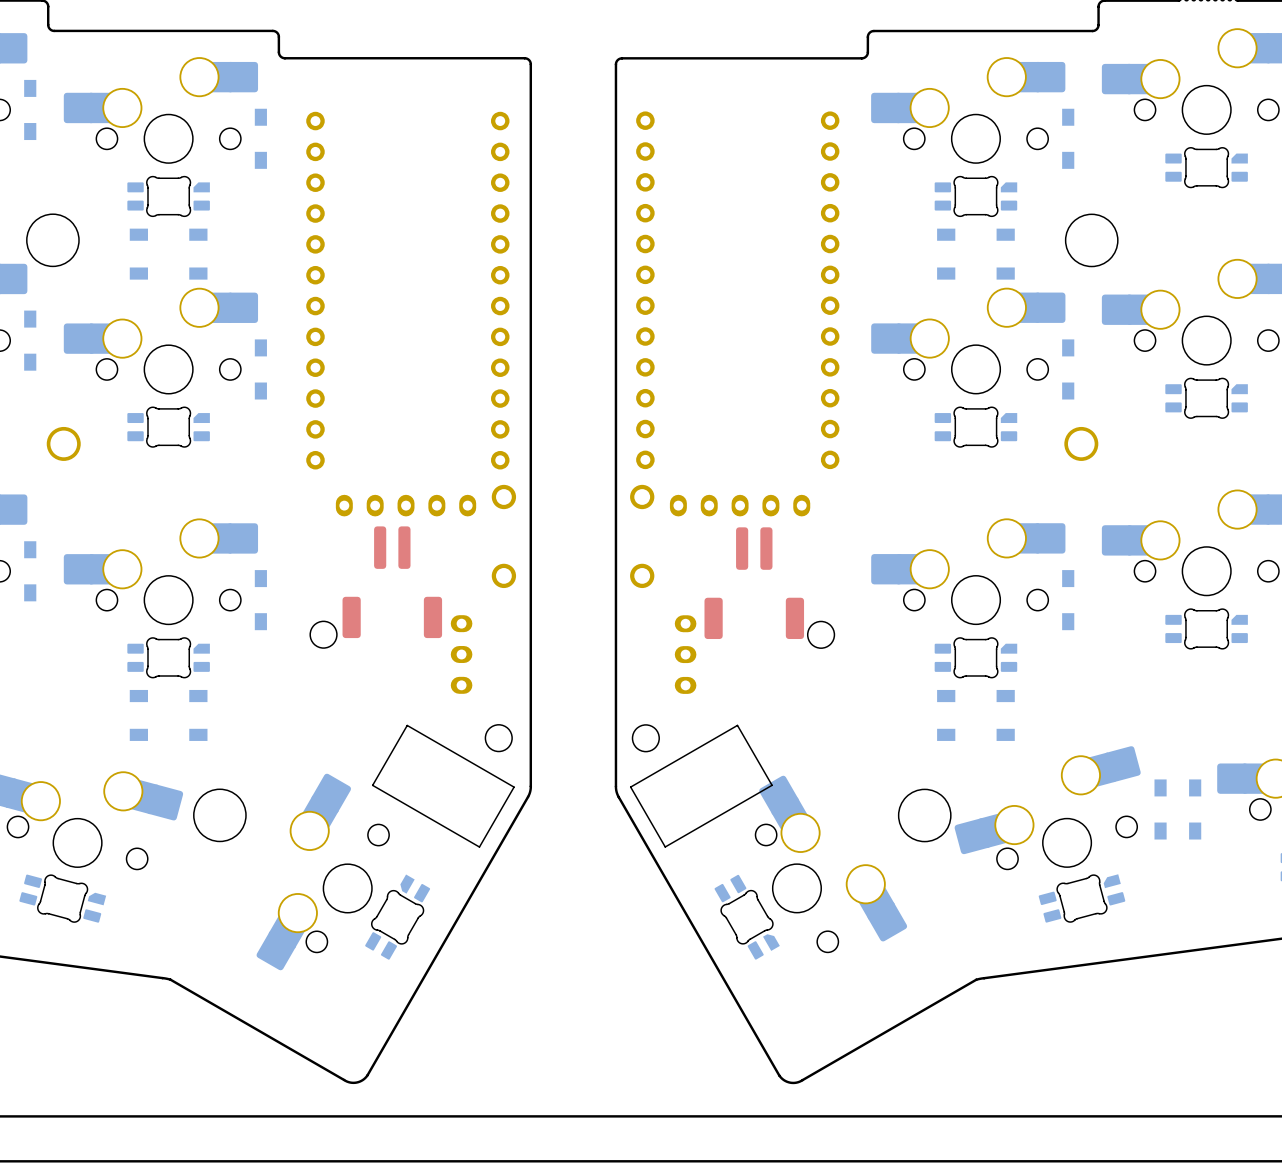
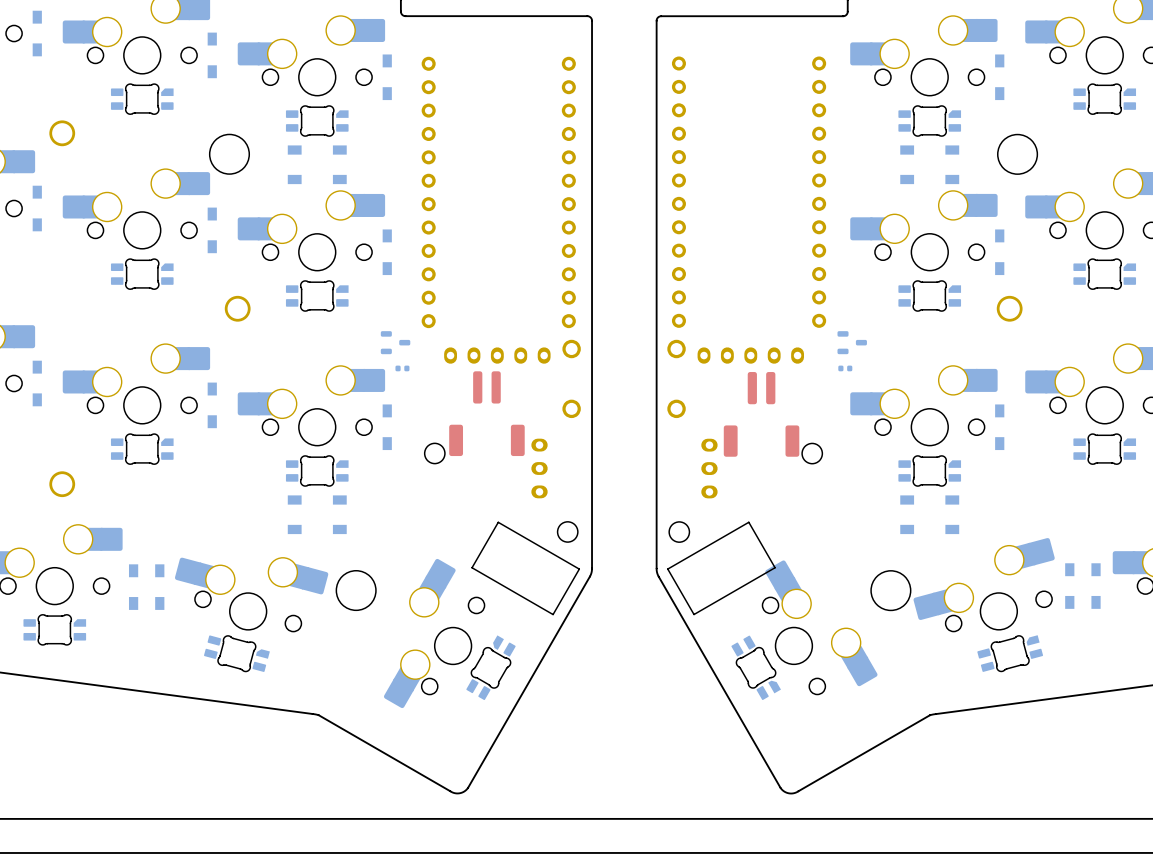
part: none -> (395, 342)
part: none -> (852, 342)
part: none -> (402, 368)
part: none -> (845, 368)

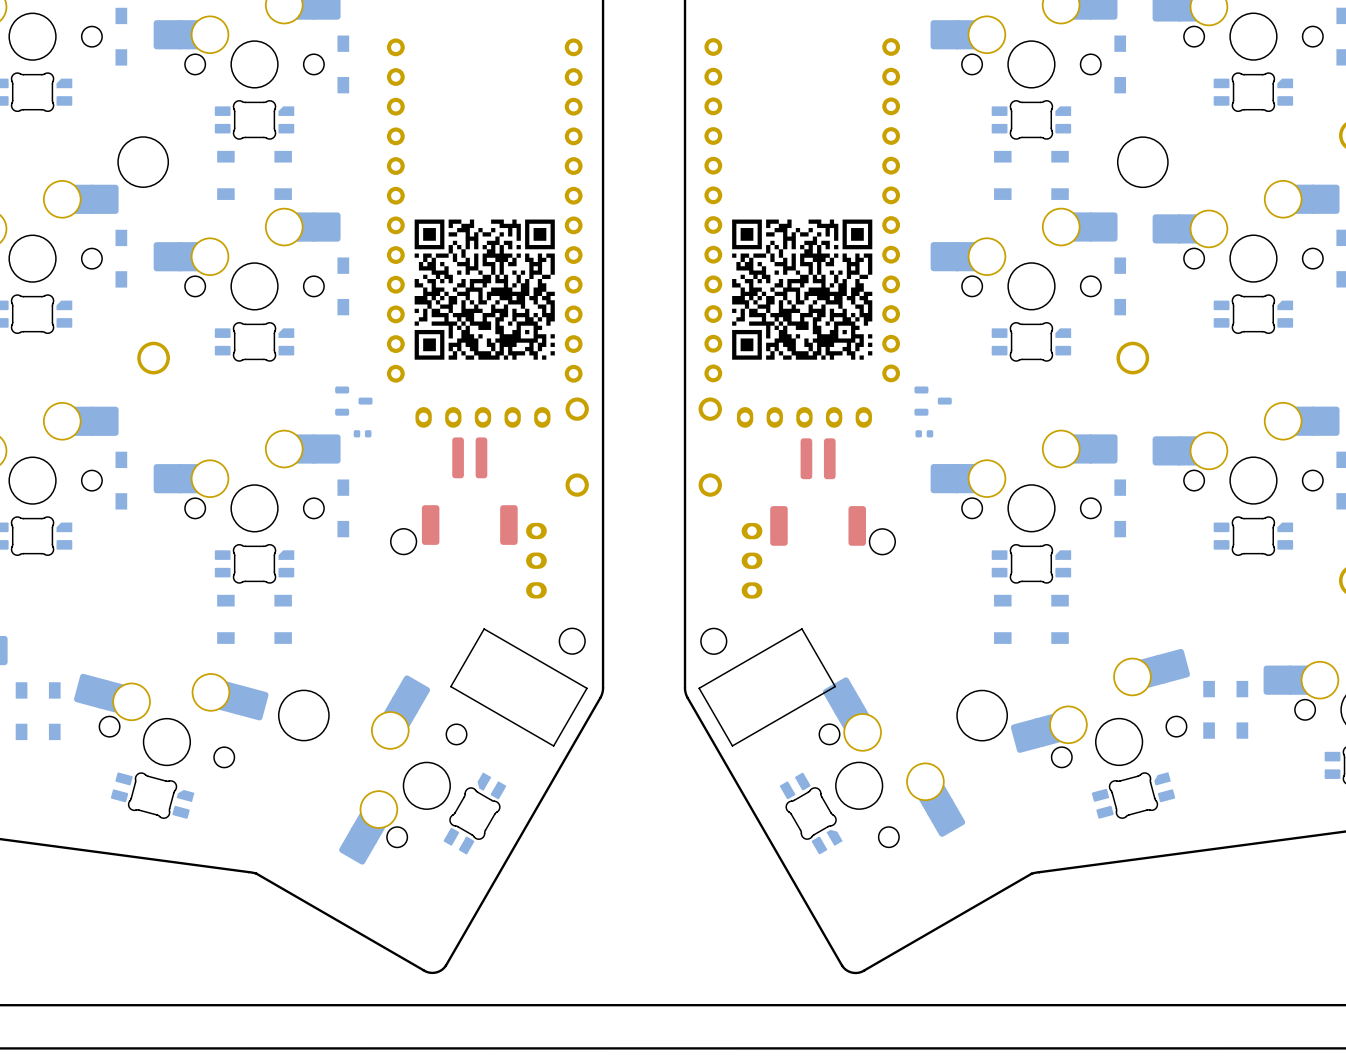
drawing: none -> [414, 219, 555, 360]
drawing: none -> [732, 219, 873, 360]

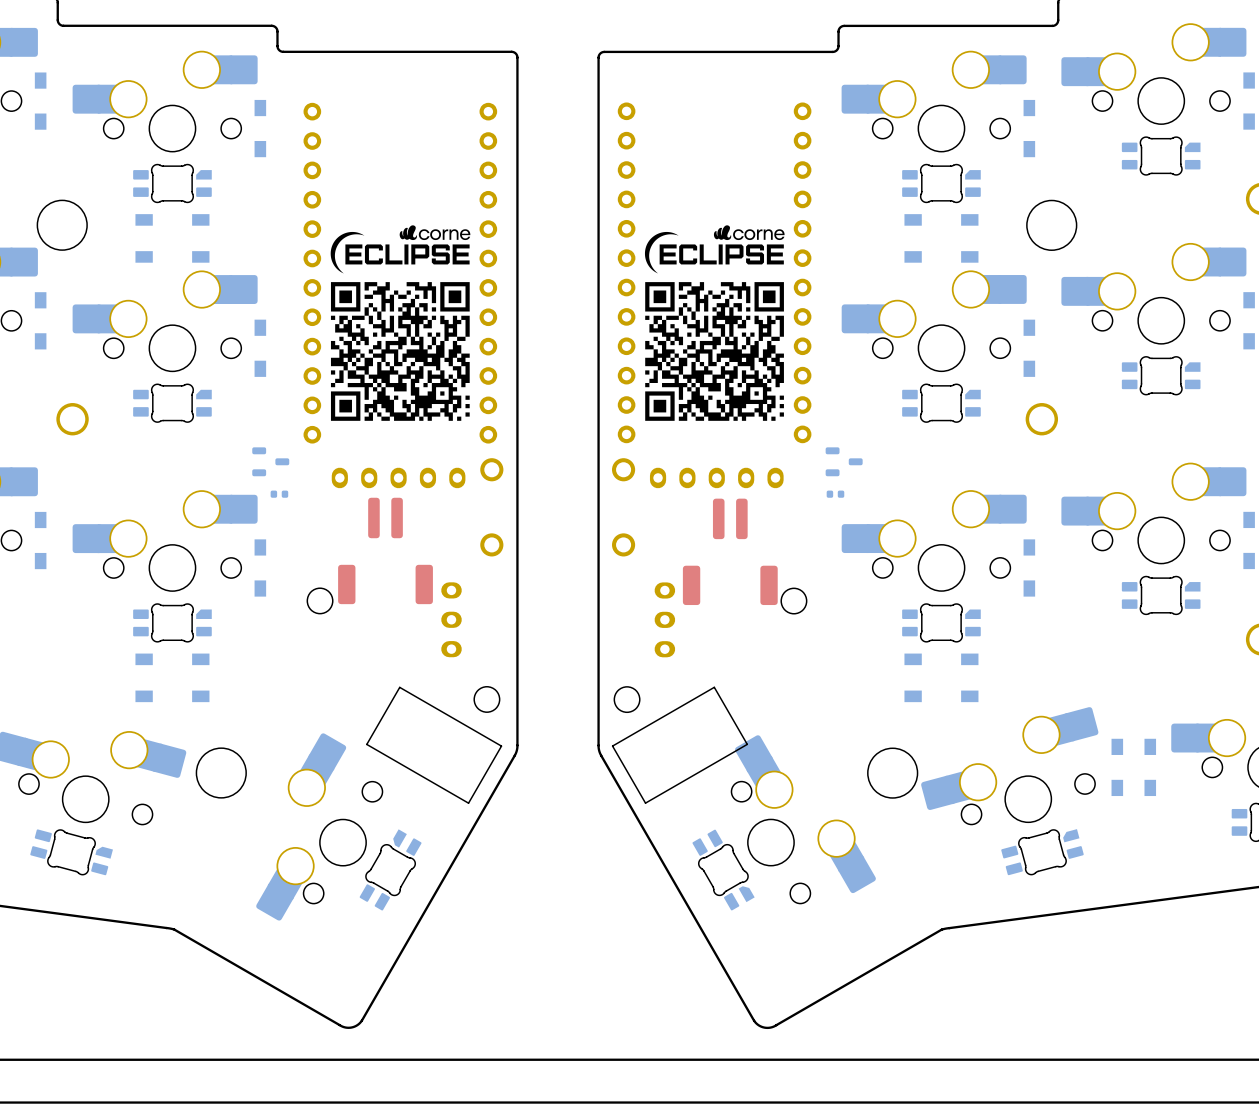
drawing: none -> [330, 225, 471, 274]
drawing: none -> [644, 225, 785, 274]

